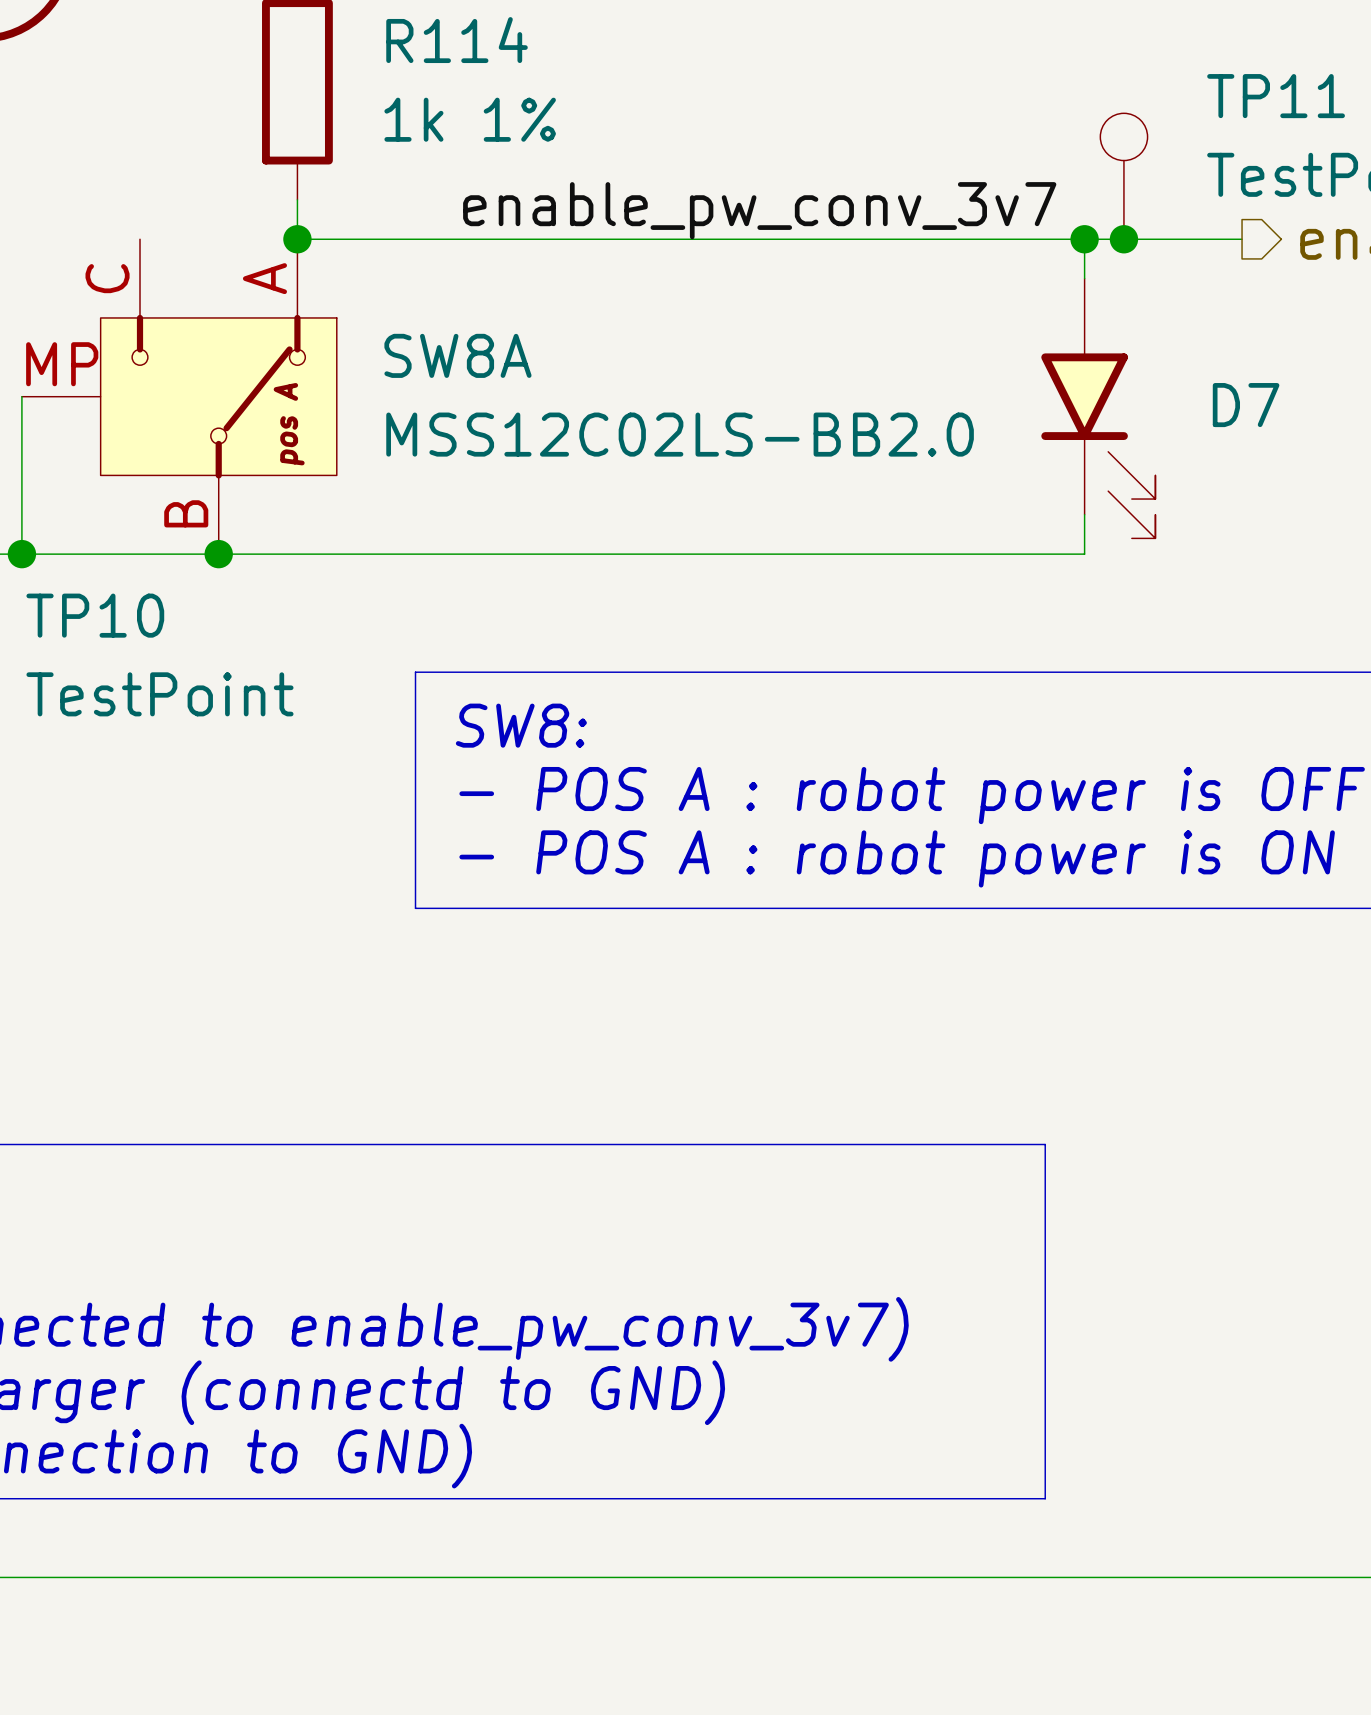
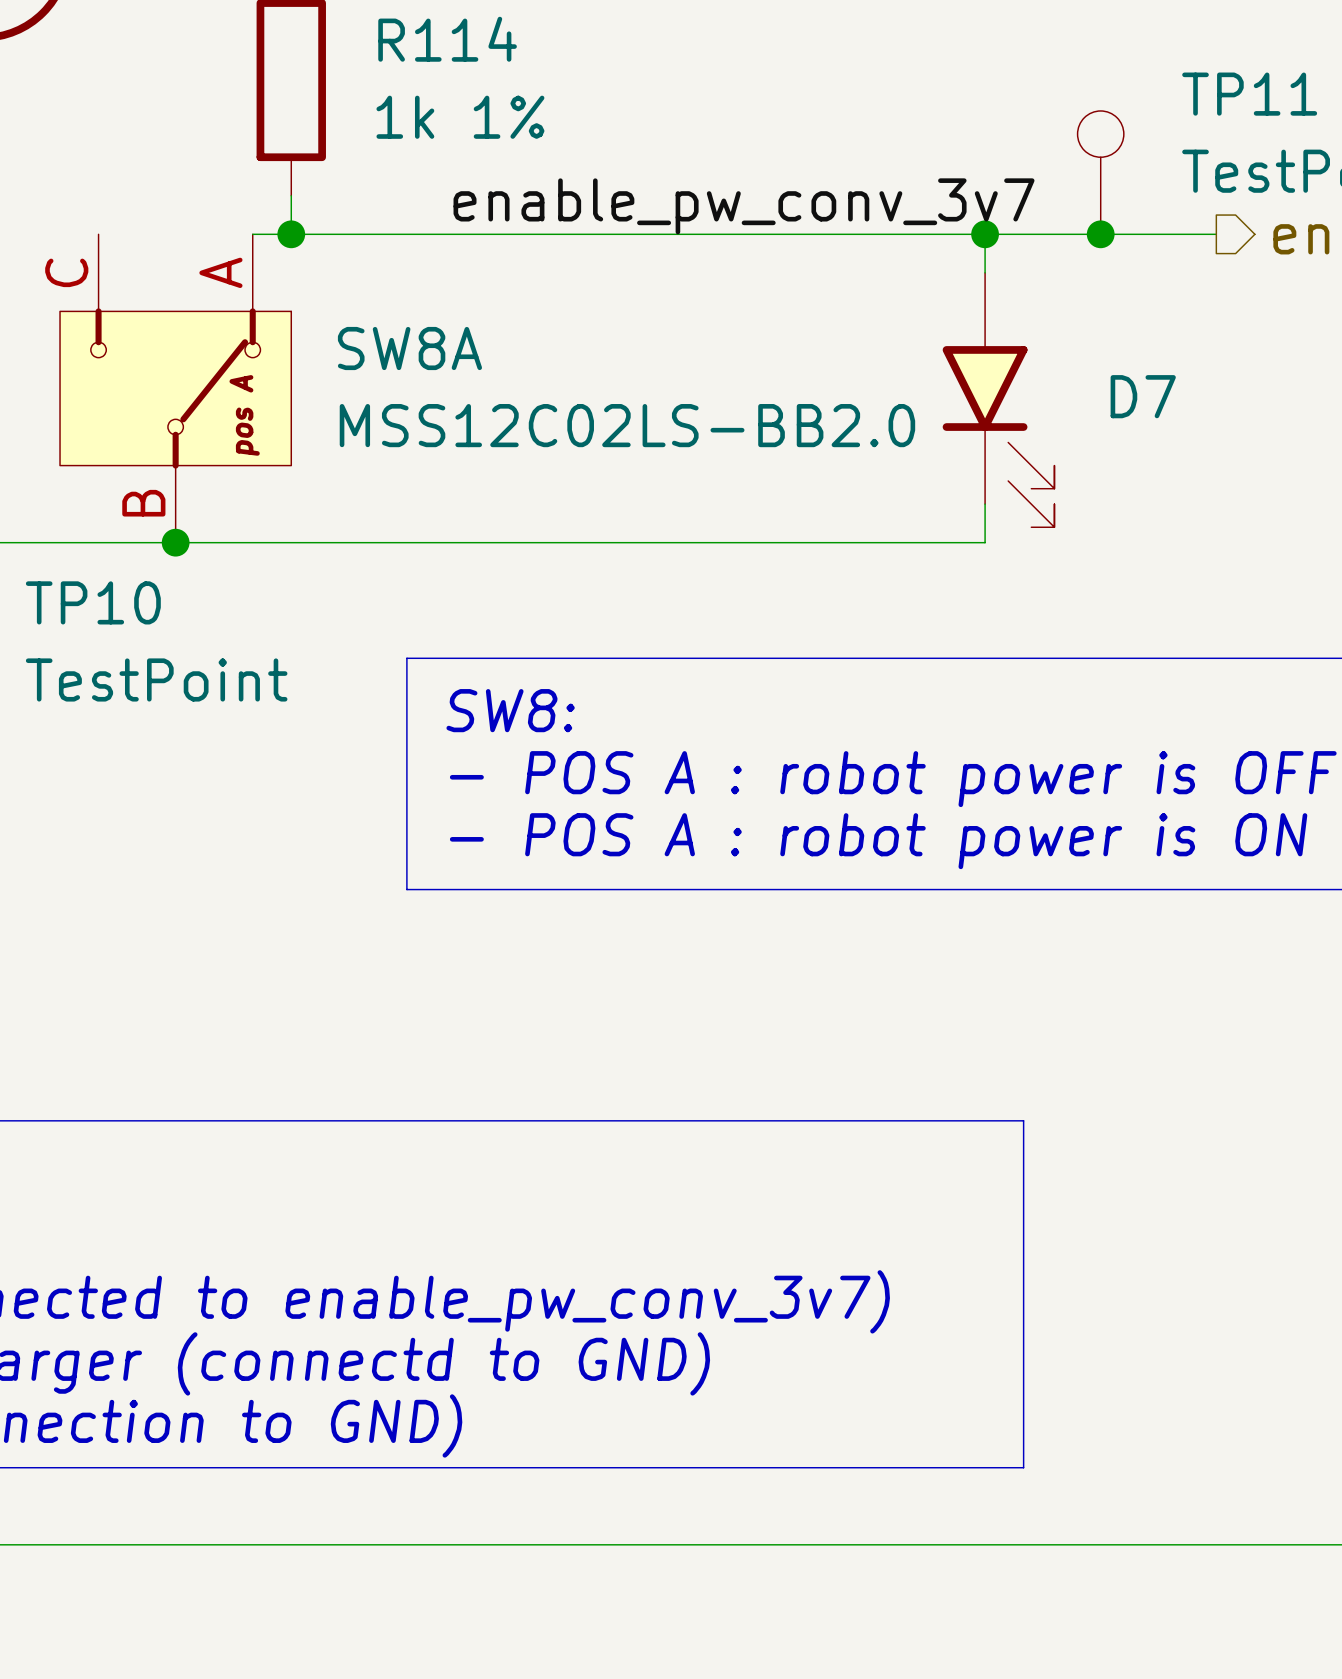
SW8A symbol: [21, 239, 337, 555] -> [60, 234, 292, 543]
wire: none -> (252, 234) (291, 234)
wire: (1084, 239) (1084, 278) -> (985, 234) (985, 272)
junction position: (1084, 239) -> (985, 234)
wire: (21, 396) (21, 554) -> none
D7 position: (1098, 408) -> (998, 400)
wire: (1084, 514) (1084, 554) (1005, 554) -> (985, 504) (985, 542)
junction: (21, 554) -> none
junction position: (218, 554) -> (175, 542)

